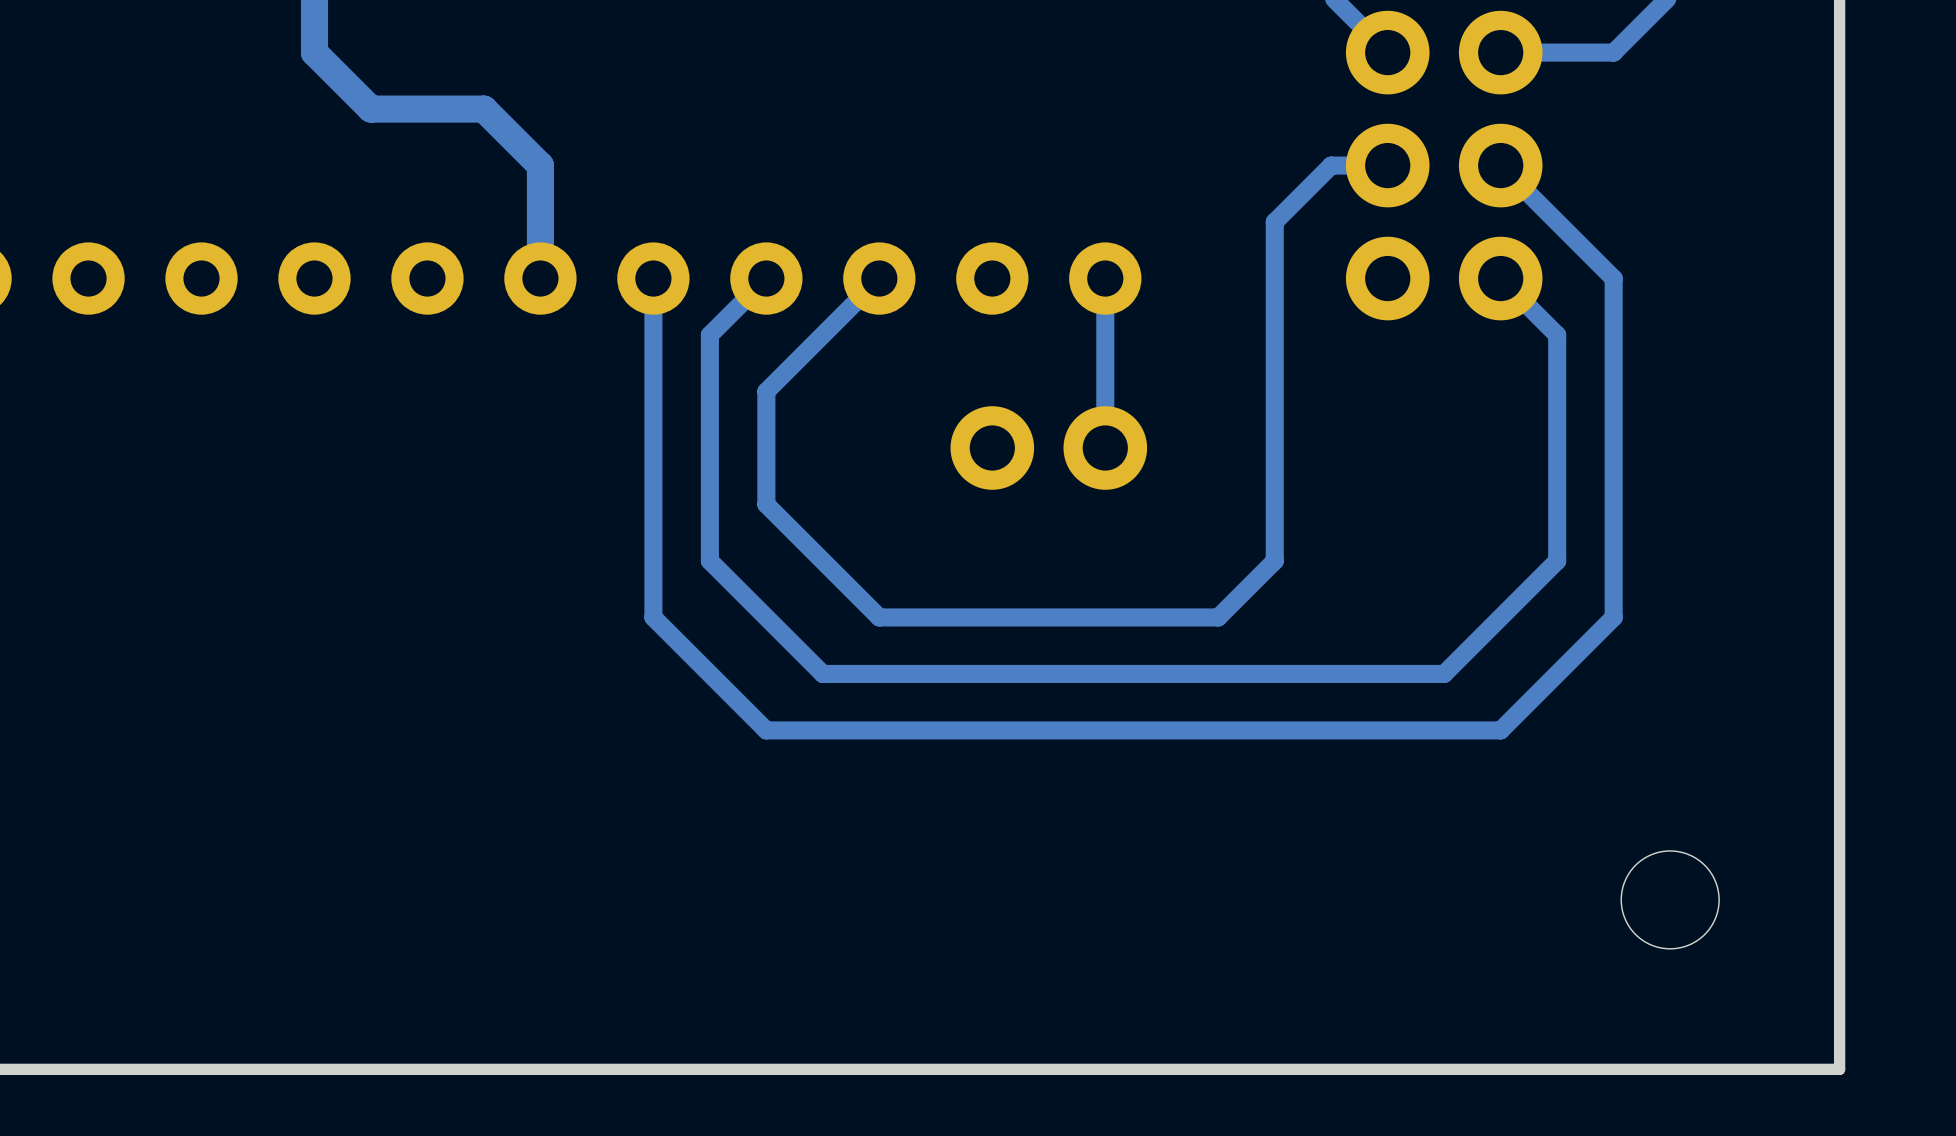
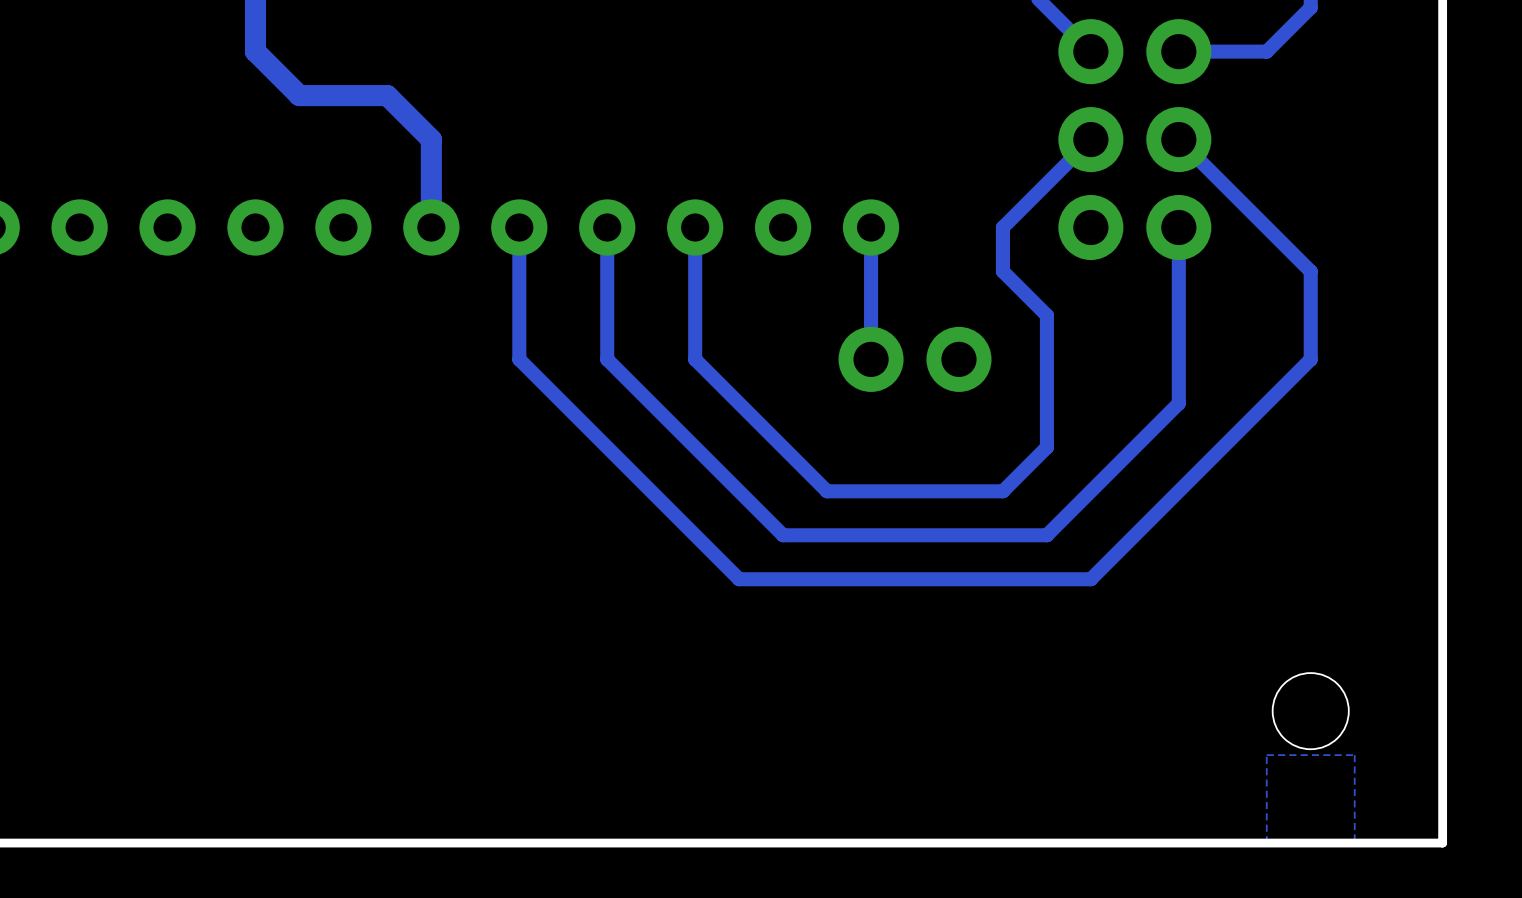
track: (1387, 165) (1331, 165) (1274, 222) (1274, 278) -> (1090, 139) (1002, 227)
track: (766, 278) (709, 335) (709, 560) (822, 673) (992, 673) -> none
track: (879, 278) (766, 391) -> (607, 227) (607, 315)
track: none -> (695, 227) (695, 359) (827, 491)
track: (1500, 278) (1557, 335) (1557, 560) -> (1266, 227) (1310, 271) (1310, 359) (1222, 447)
track: none -> (1178, 227) (1178, 403) (1046, 535)
track: (1613, 278) (1613, 617) (1500, 730) (1387, 730) -> none
track: (1274, 335) (1274, 560) (1218, 617) -> (1002, 271) (1046, 315) (1046, 447) (1002, 491) (958, 491)
track: (653, 448) (653, 617) (766, 730) (935, 730) -> (519, 359) (739, 579)
track: (766, 448) (766, 504) (879, 617) (1048, 617) -> (607, 359) (783, 535)
part position: (1048, 448) -> (915, 359)
track: (1444, 673) (1331, 673) -> (1134, 535) (1090, 579)
zone outline: none -> (1354, 843) (1354, 755) (1266, 755) (1266, 843)

